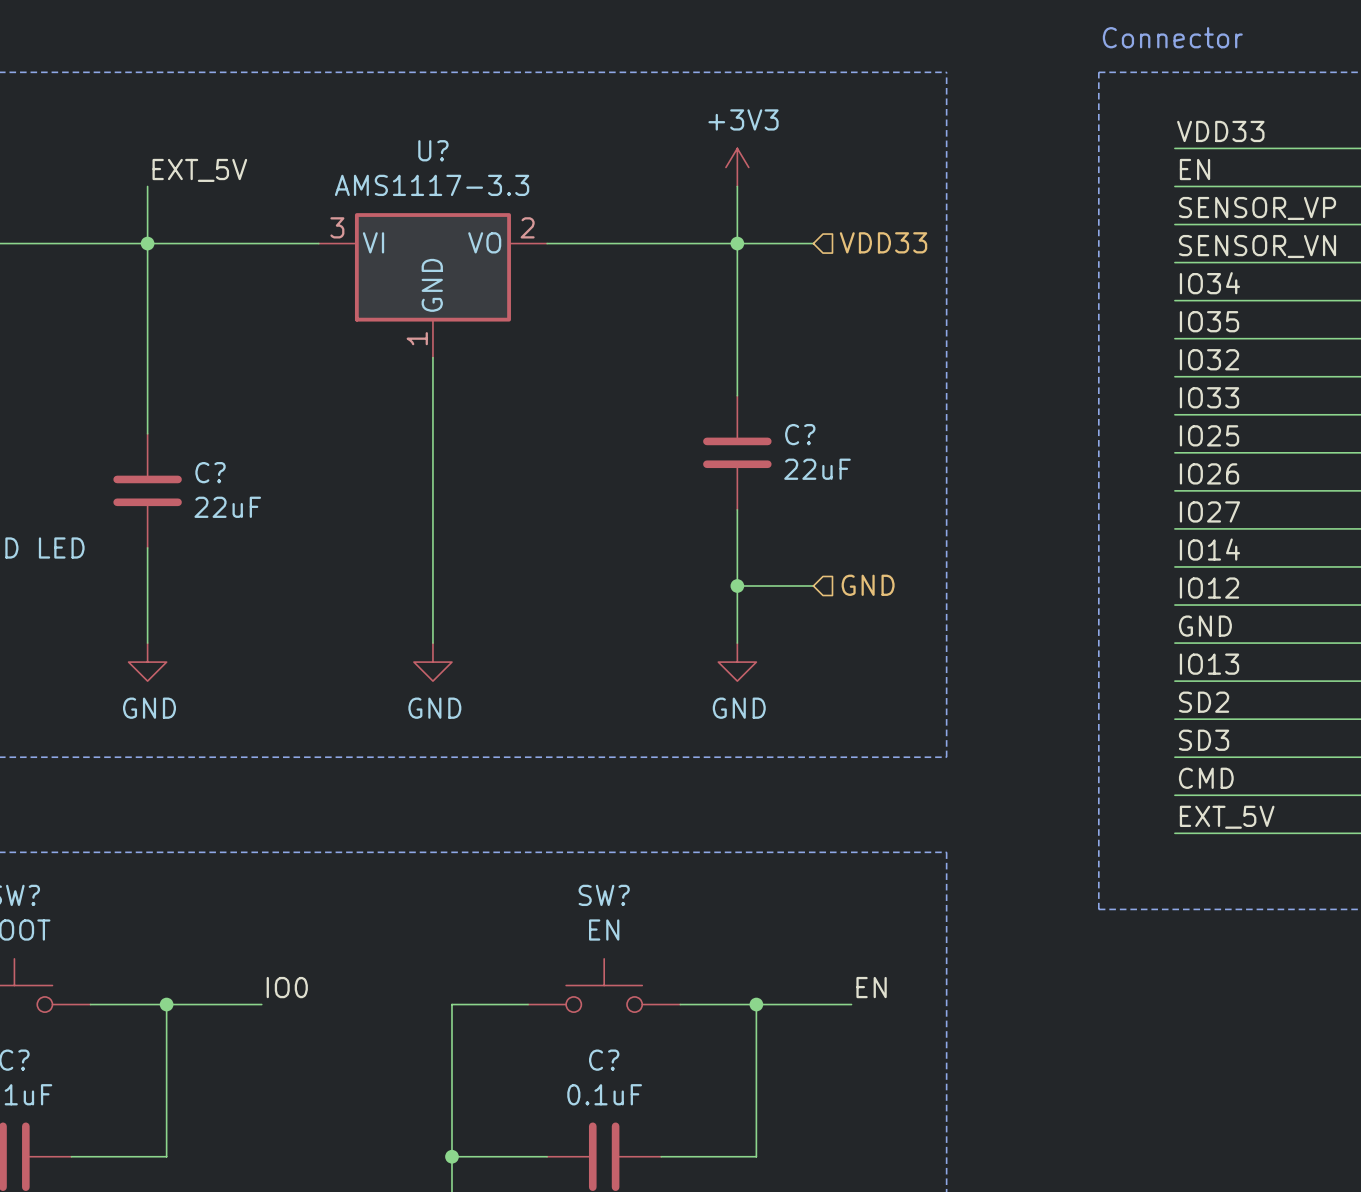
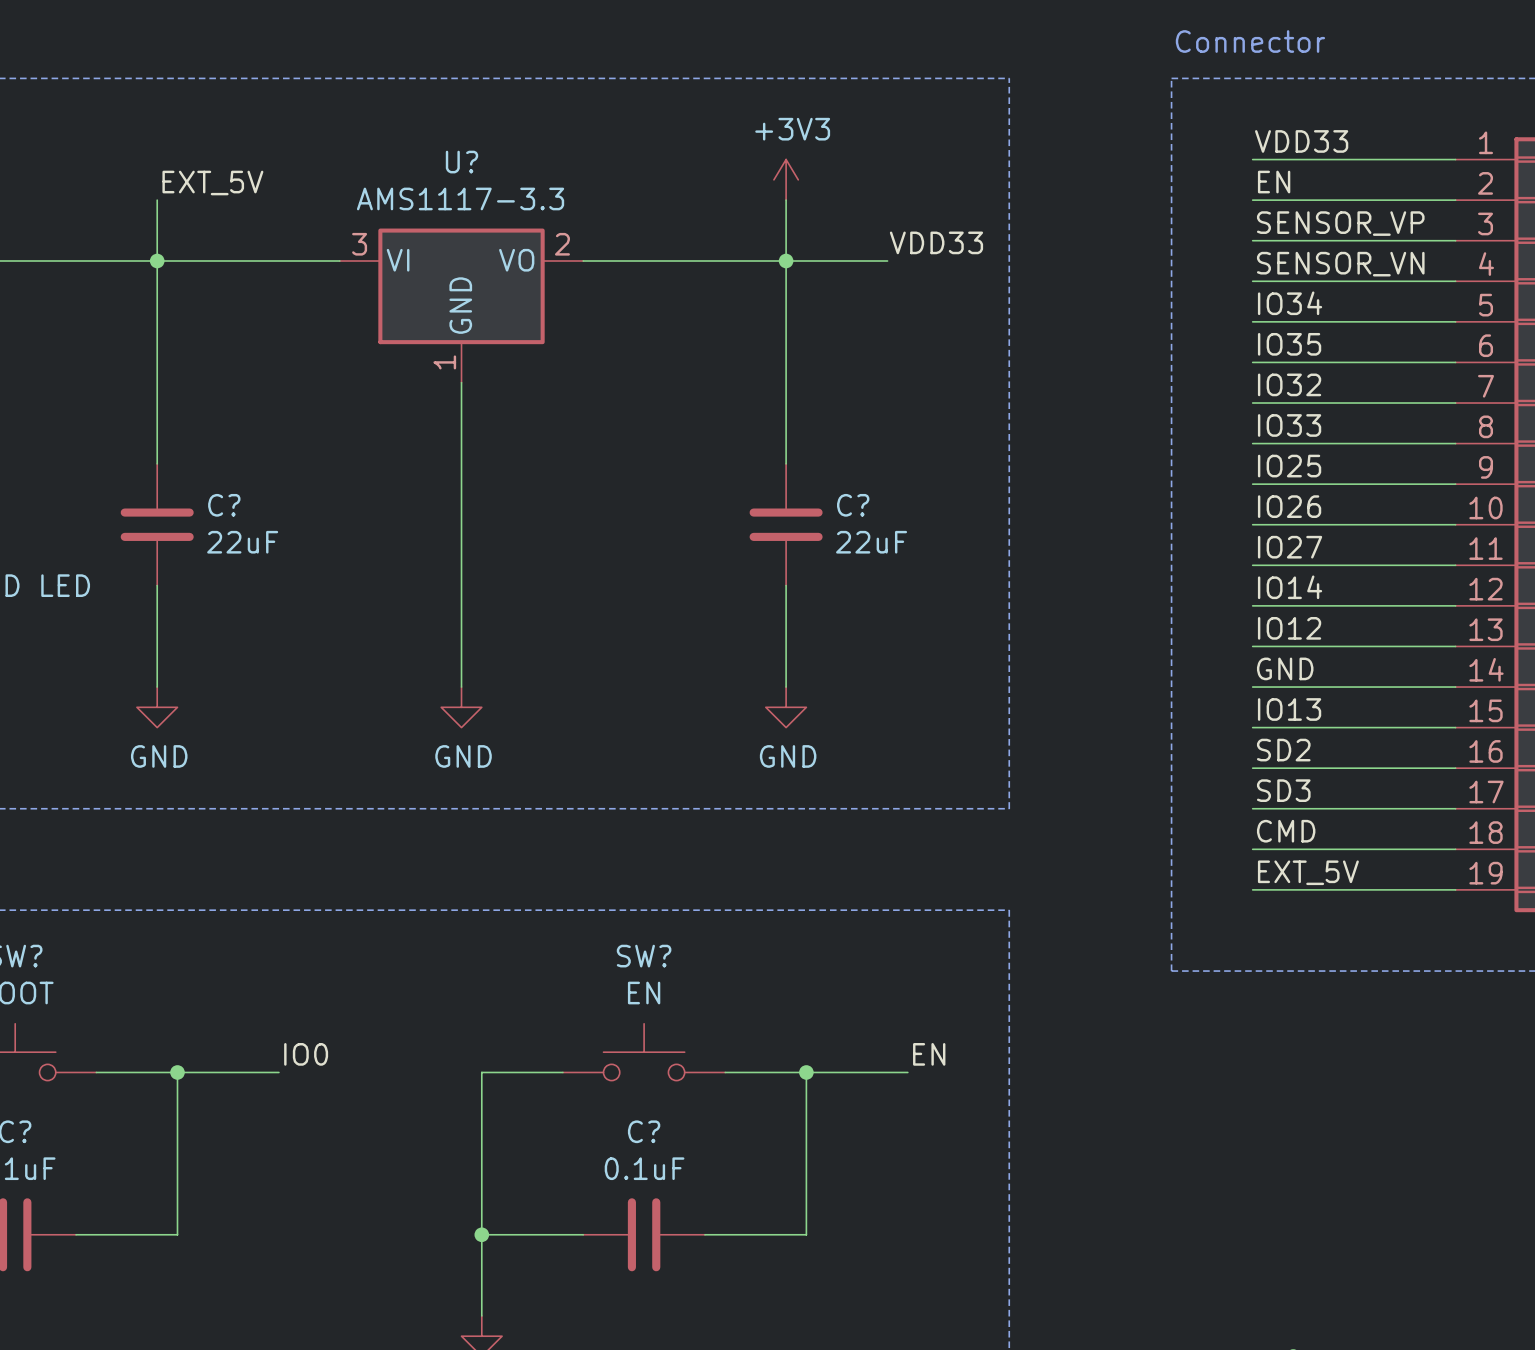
label: none -> VDD33 (936, 242)
hierarchical label: VDD33 (883, 242) -> none
wire: none -> (867, 260) (887, 260)
C? position: (737, 452) -> (786, 524)
wire: (737, 585) (813, 585) -> none
junction: (737, 585) -> none
hierarchical label: GND (868, 585) -> none

